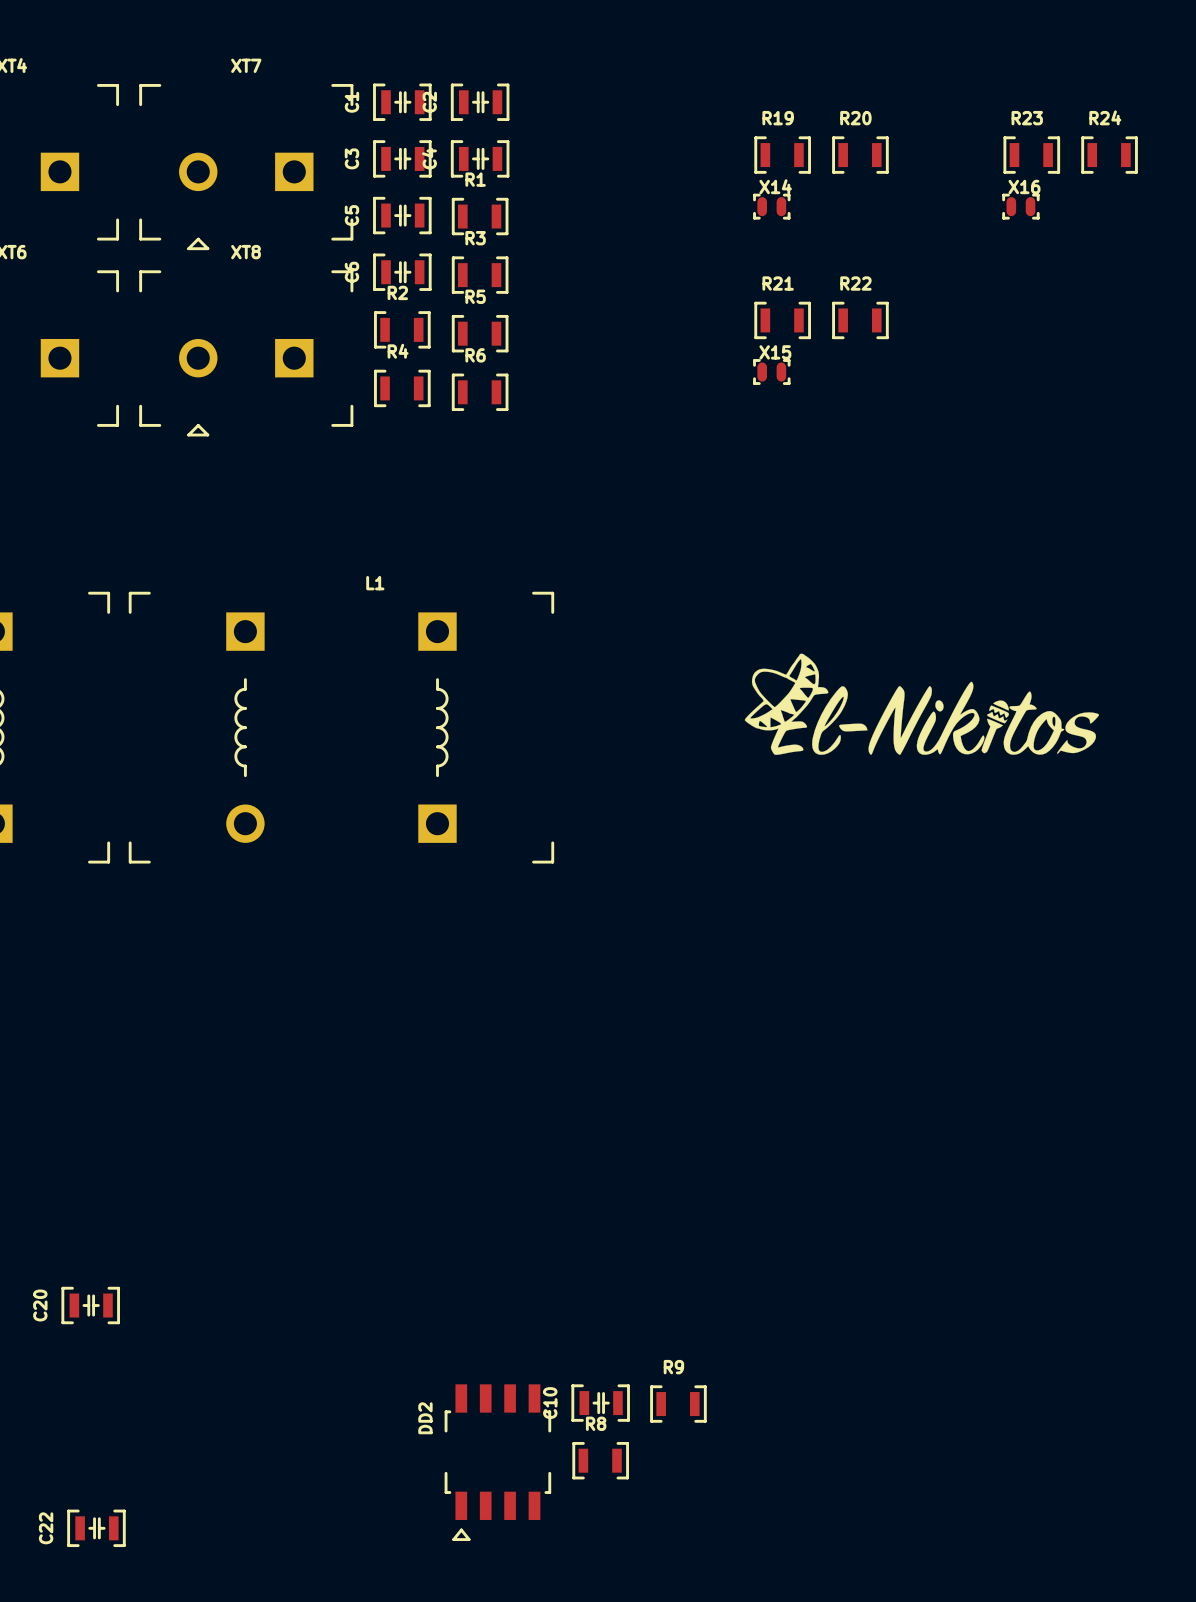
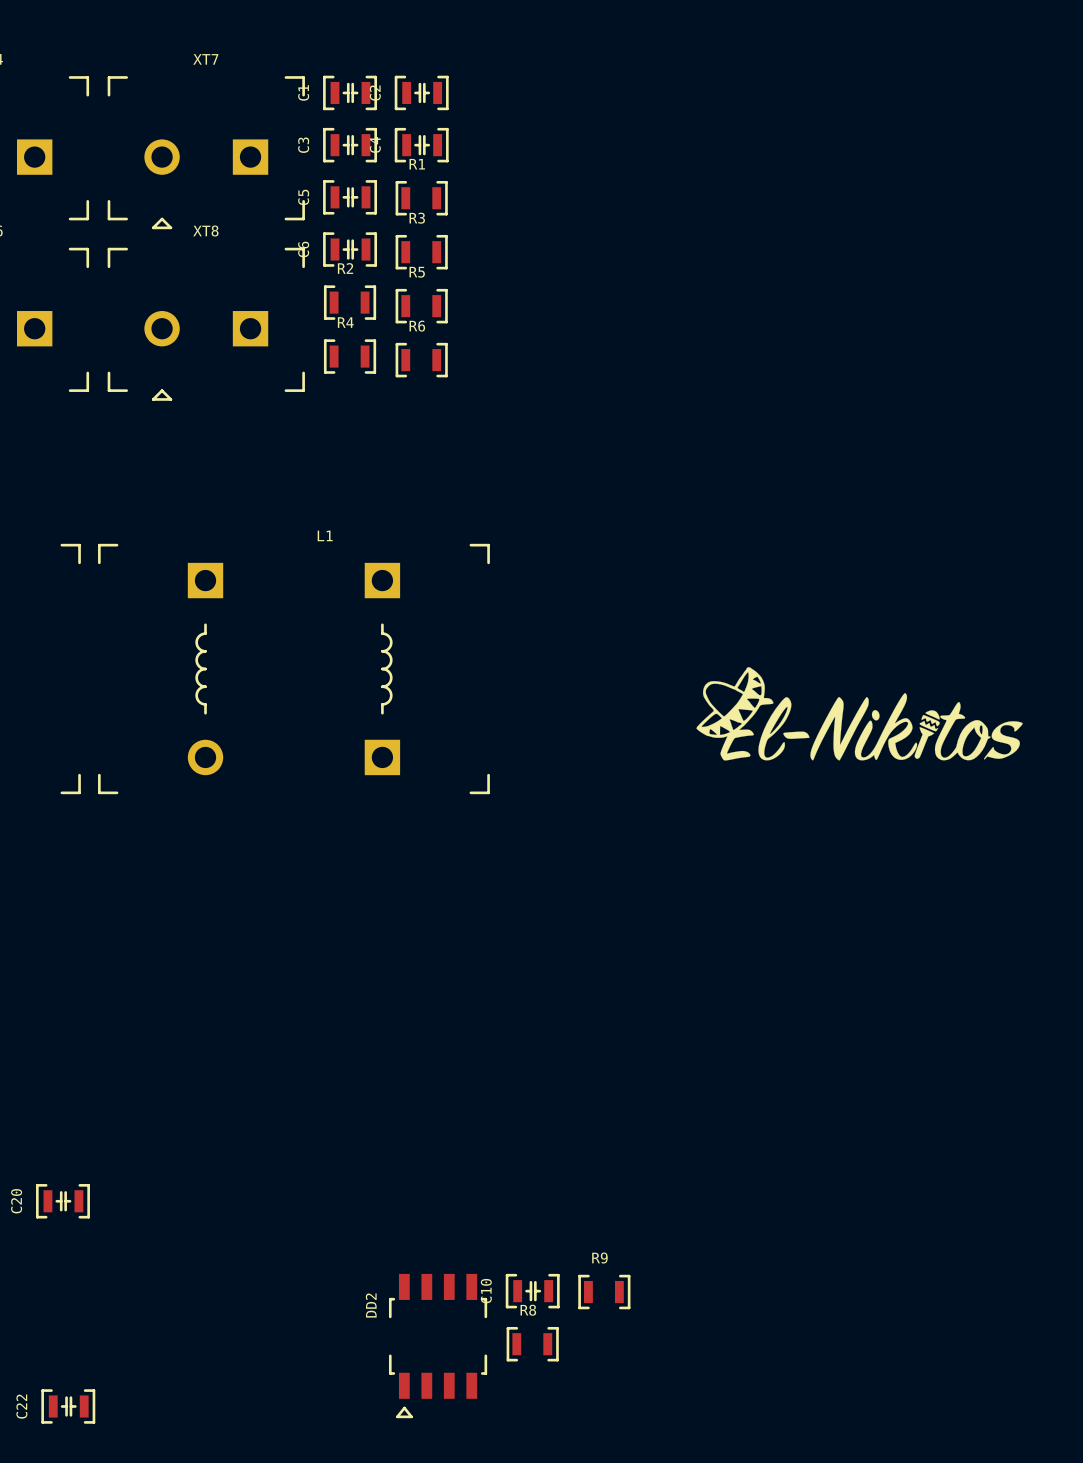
R19: (782, 155) -> none
R20: (860, 155) -> none
R23: (1031, 155) -> none
R24: (1109, 155) -> none
X14: (771, 206) -> none
X16: (1020, 206) -> none
R21: (782, 320) -> none
R22: (860, 320) -> none
X15: (771, 372) -> none
drawing position: (921, 704) -> (859, 713)

